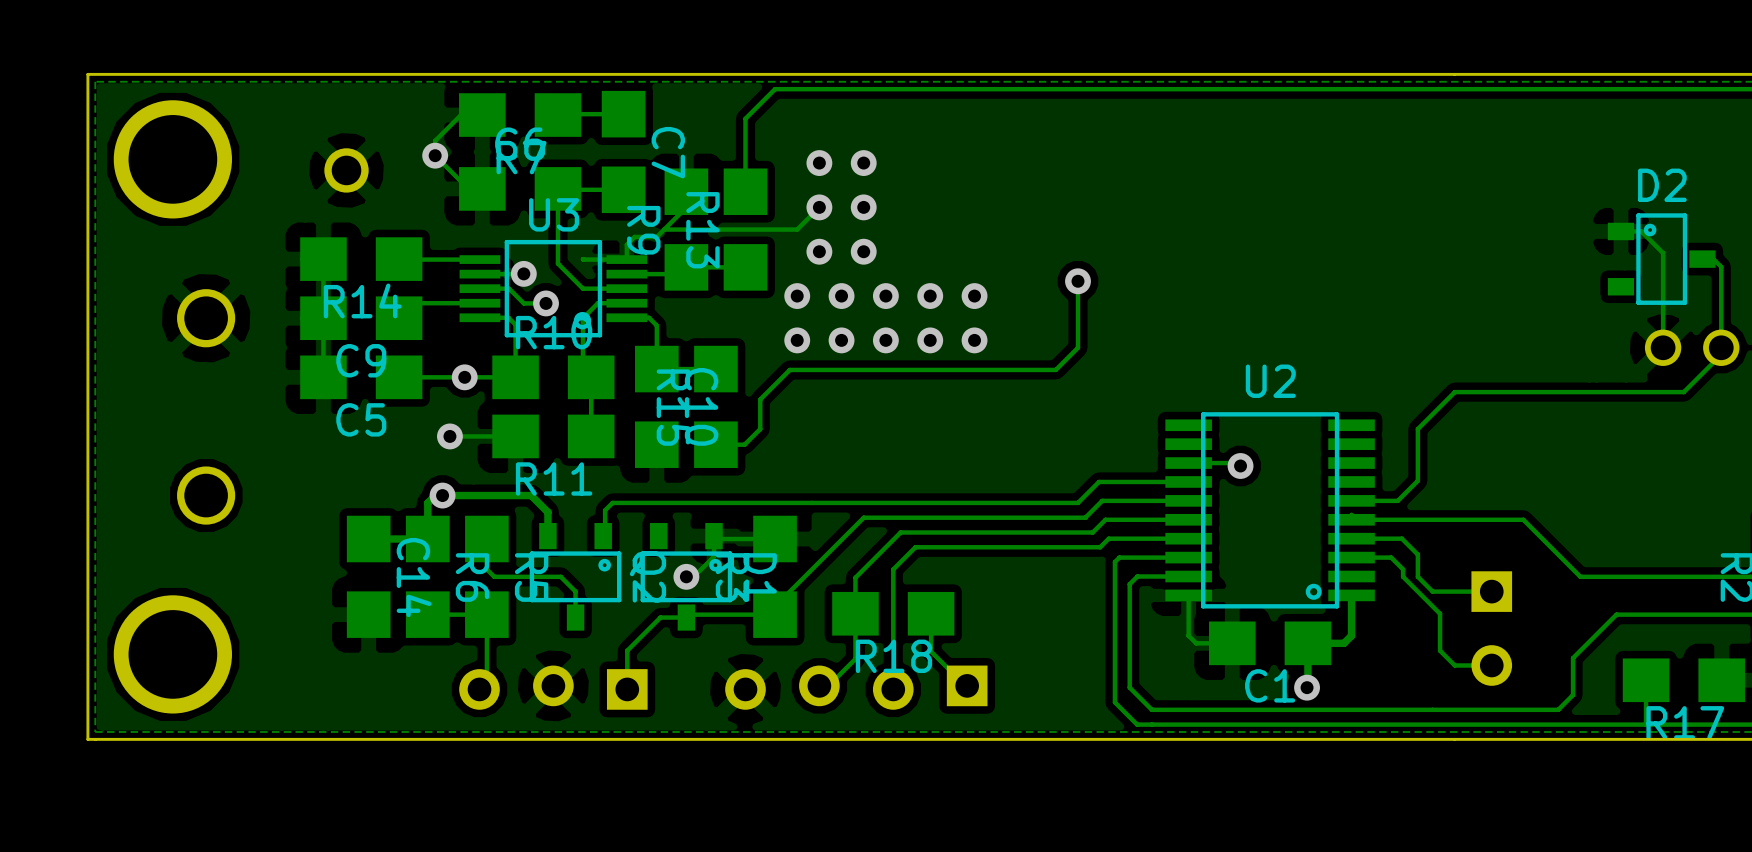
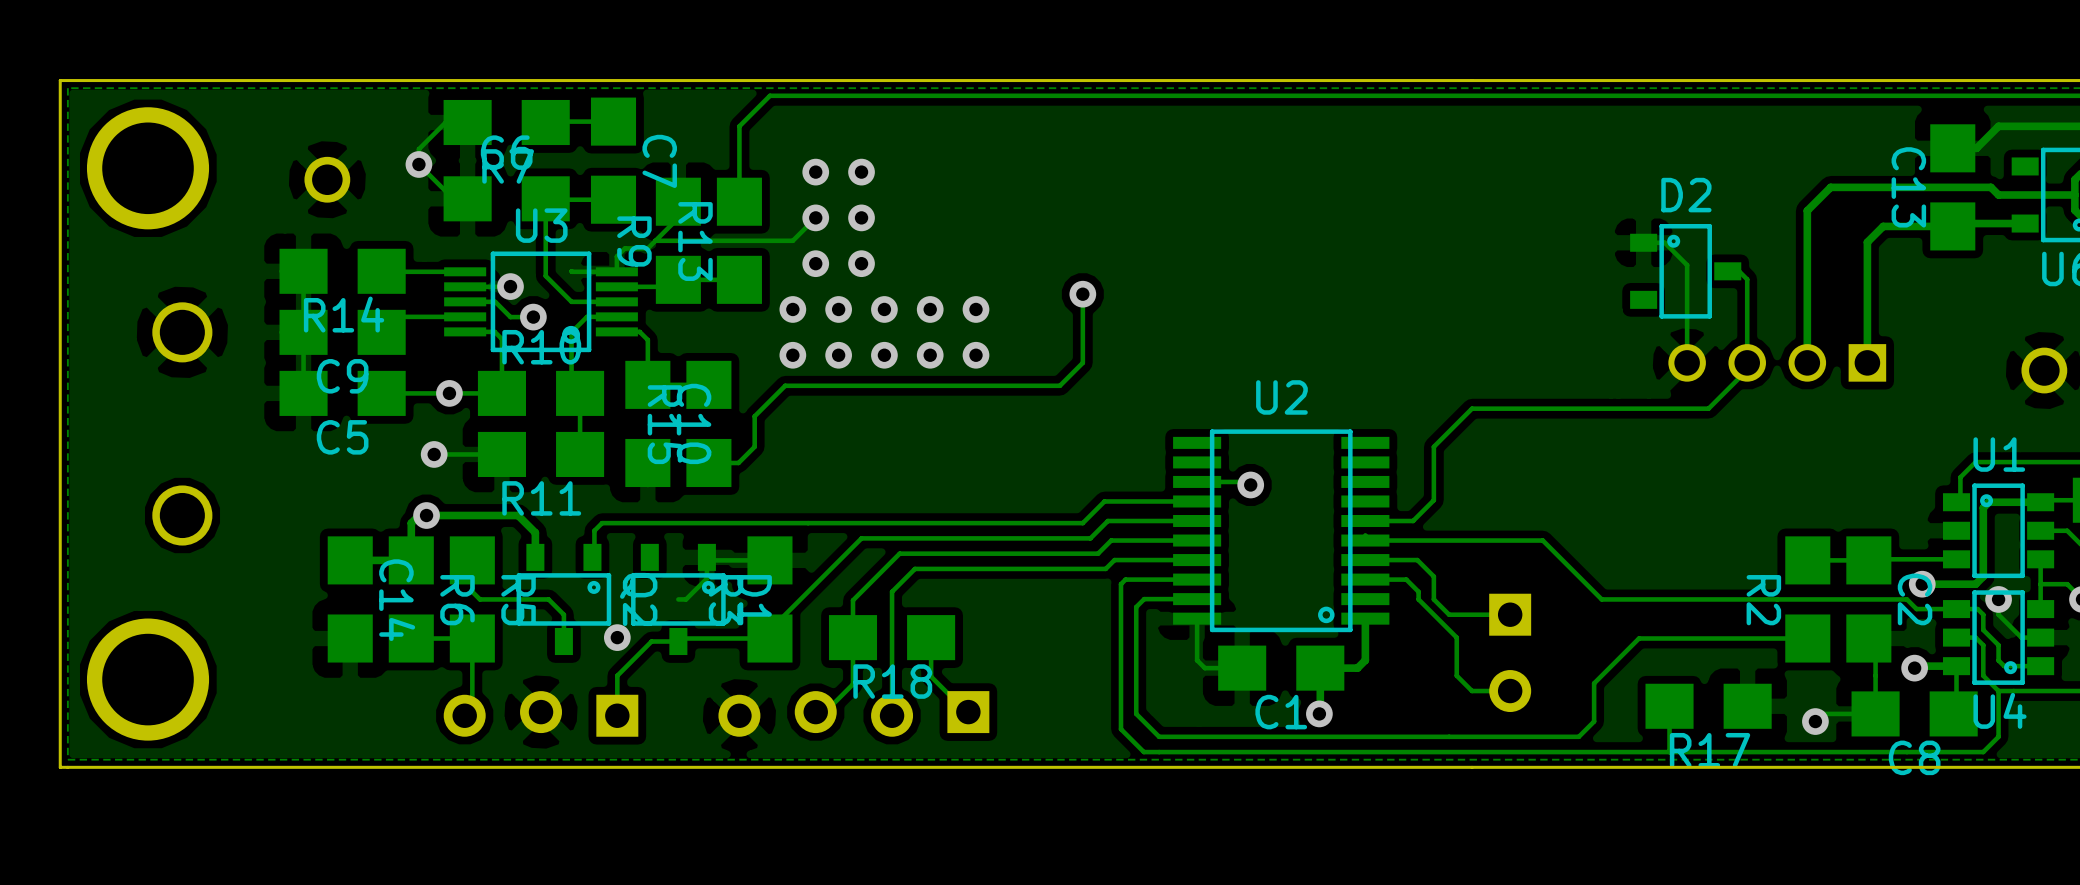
via position: (686, 576) -> (617, 637)

